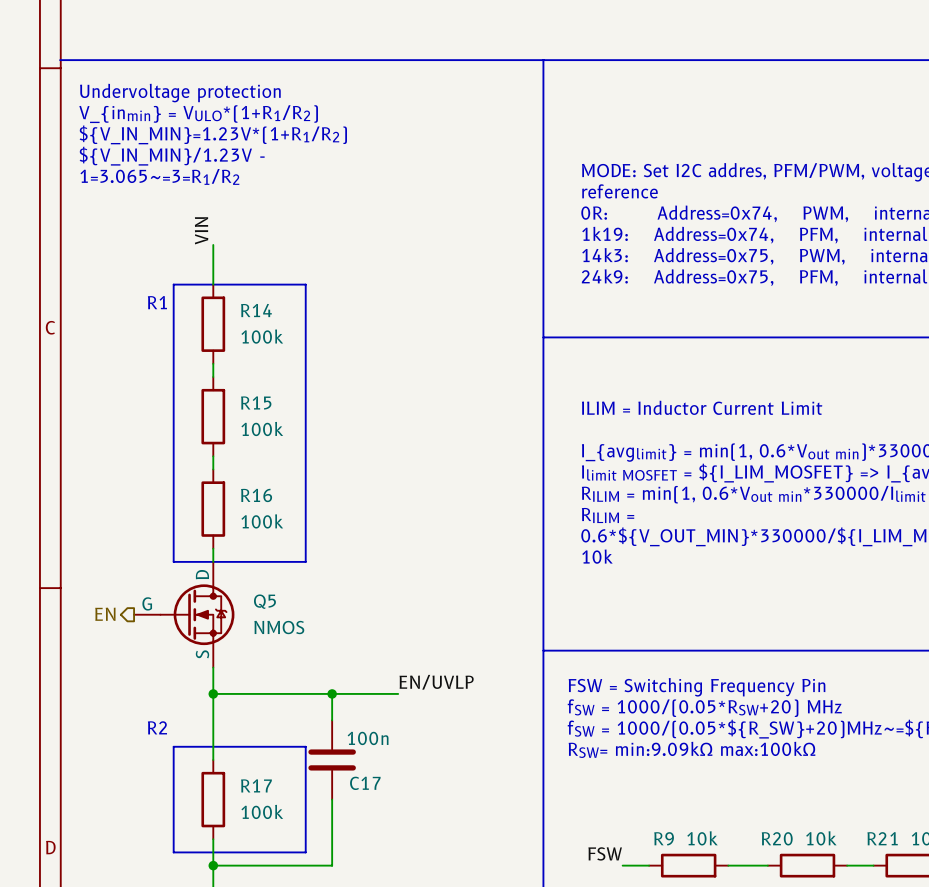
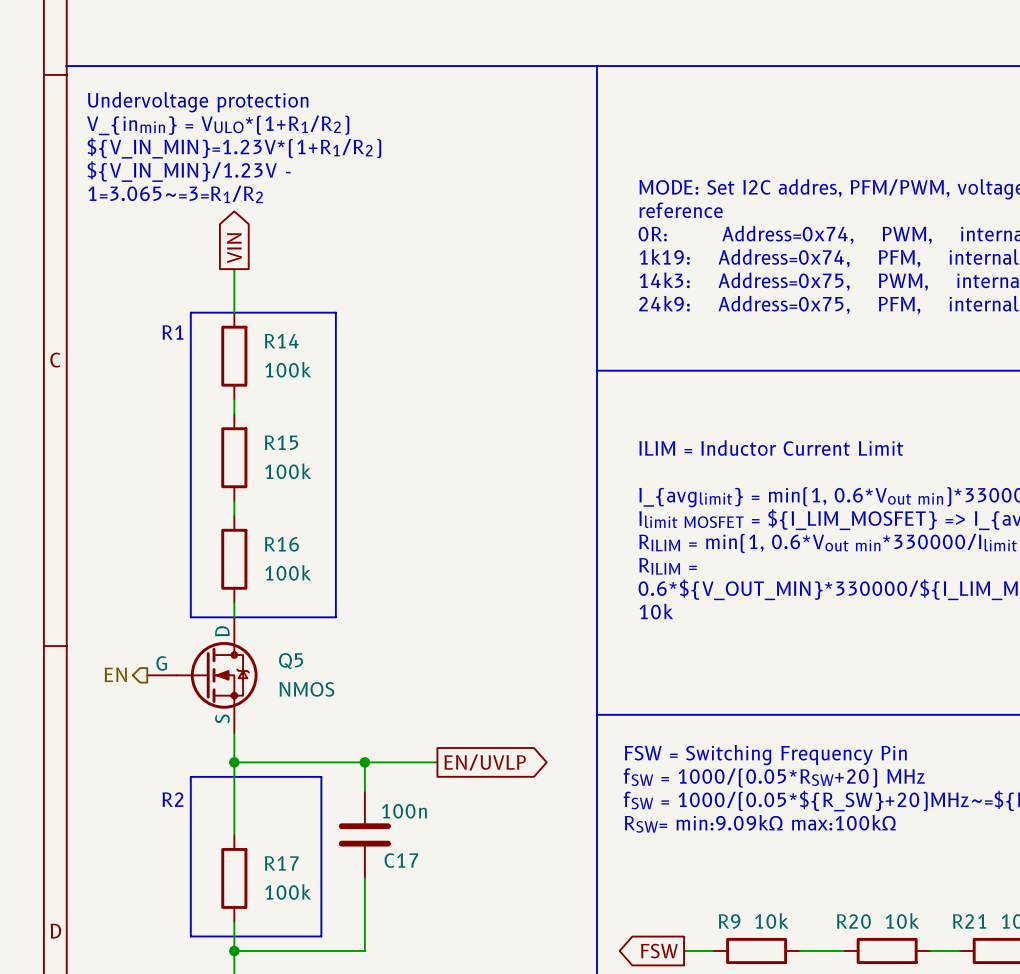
global label: none -> VIN (234, 248)
label: VIN (201, 230) -> none
label: EN/UVLP (436, 682) -> none
global label: none -> EN/UVLP (485, 762)
line: (173, 746) (305, 746) (305, 852) (292, 852) -> (190, 820) (190, 776) (321, 776) (321, 936)
label: FSW (605, 853) -> none
global label: none -> FSW (659, 951)

